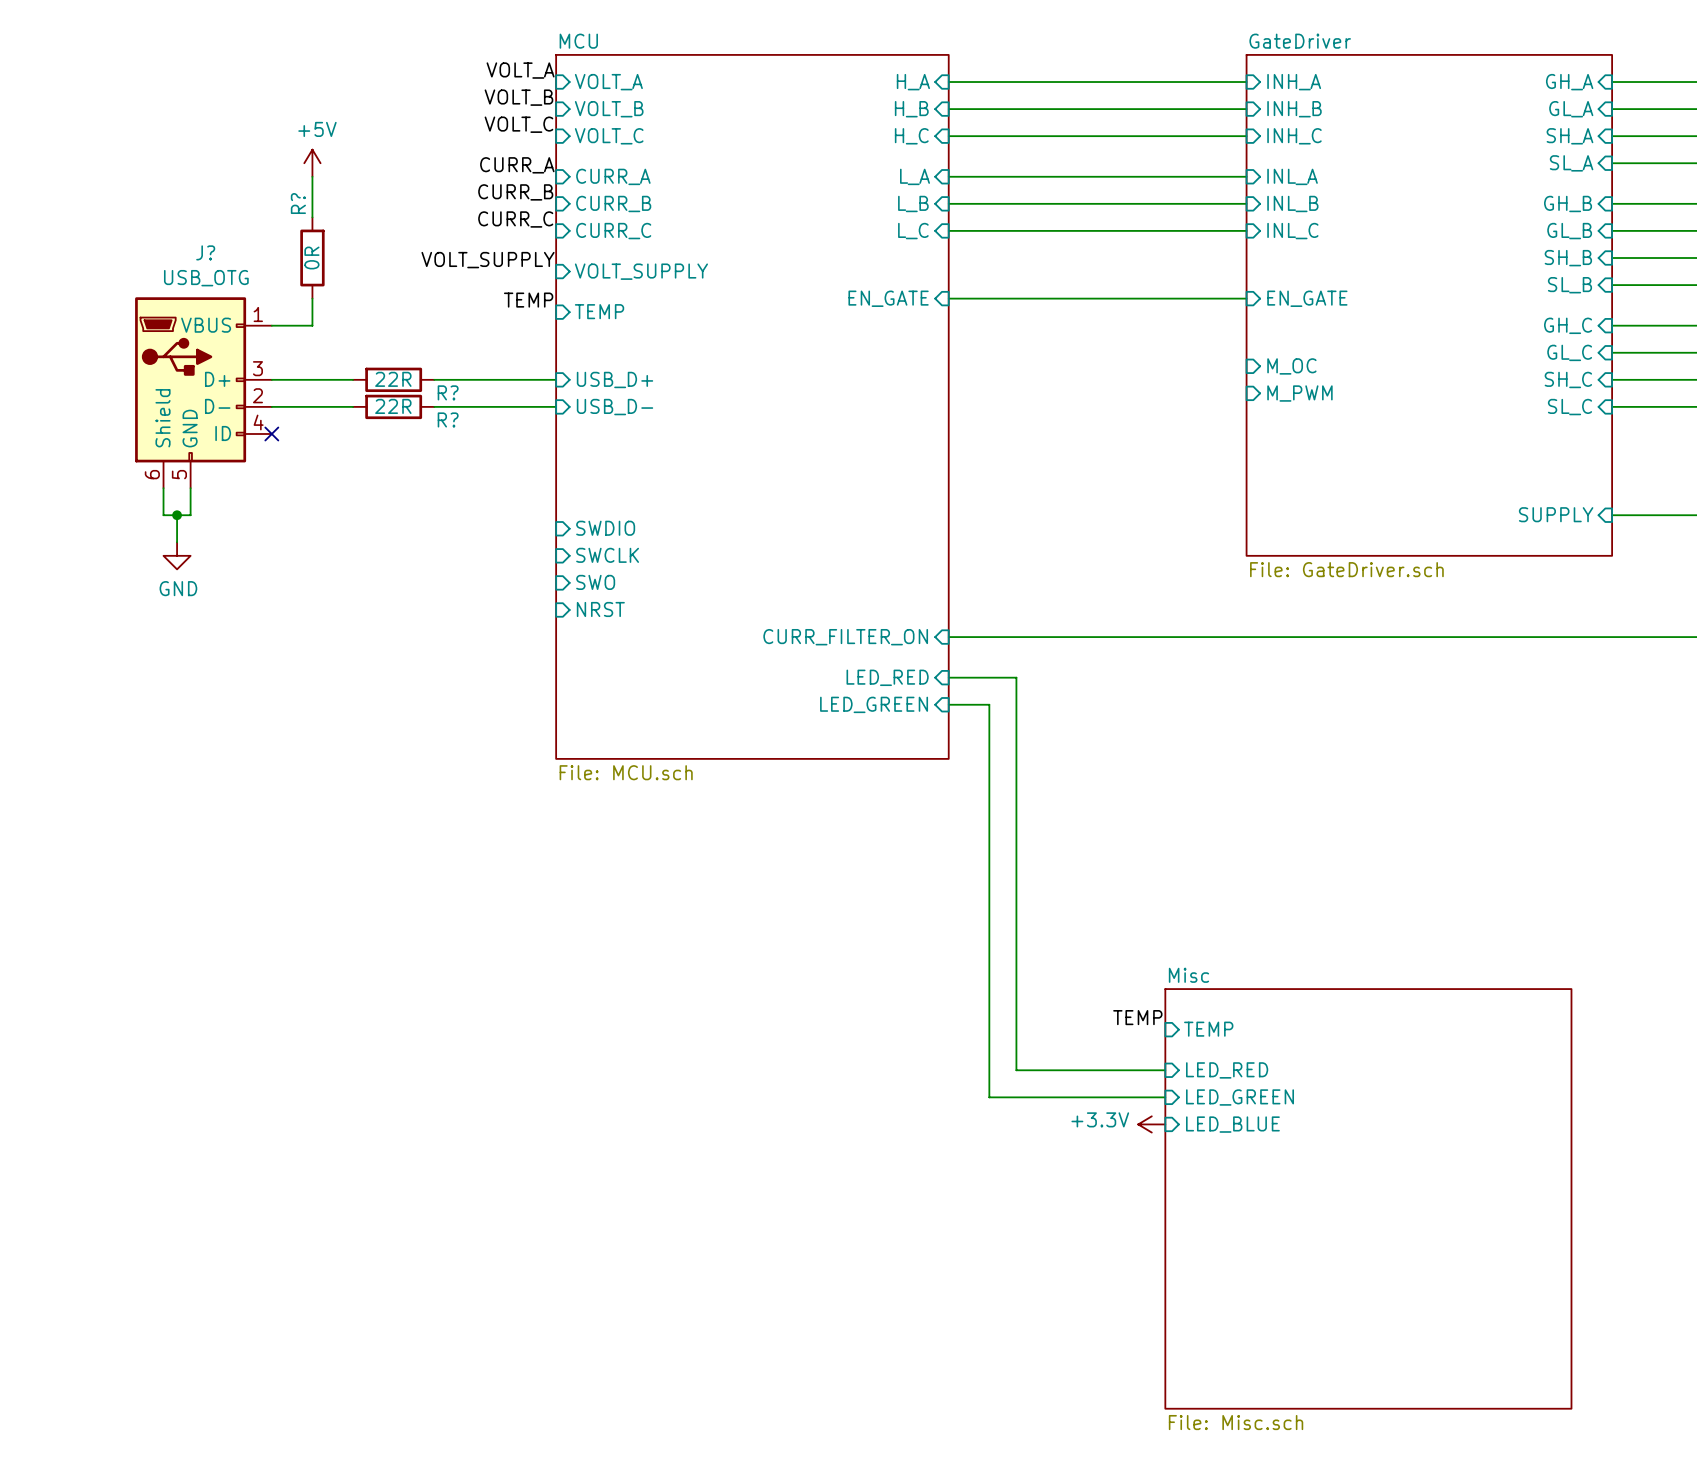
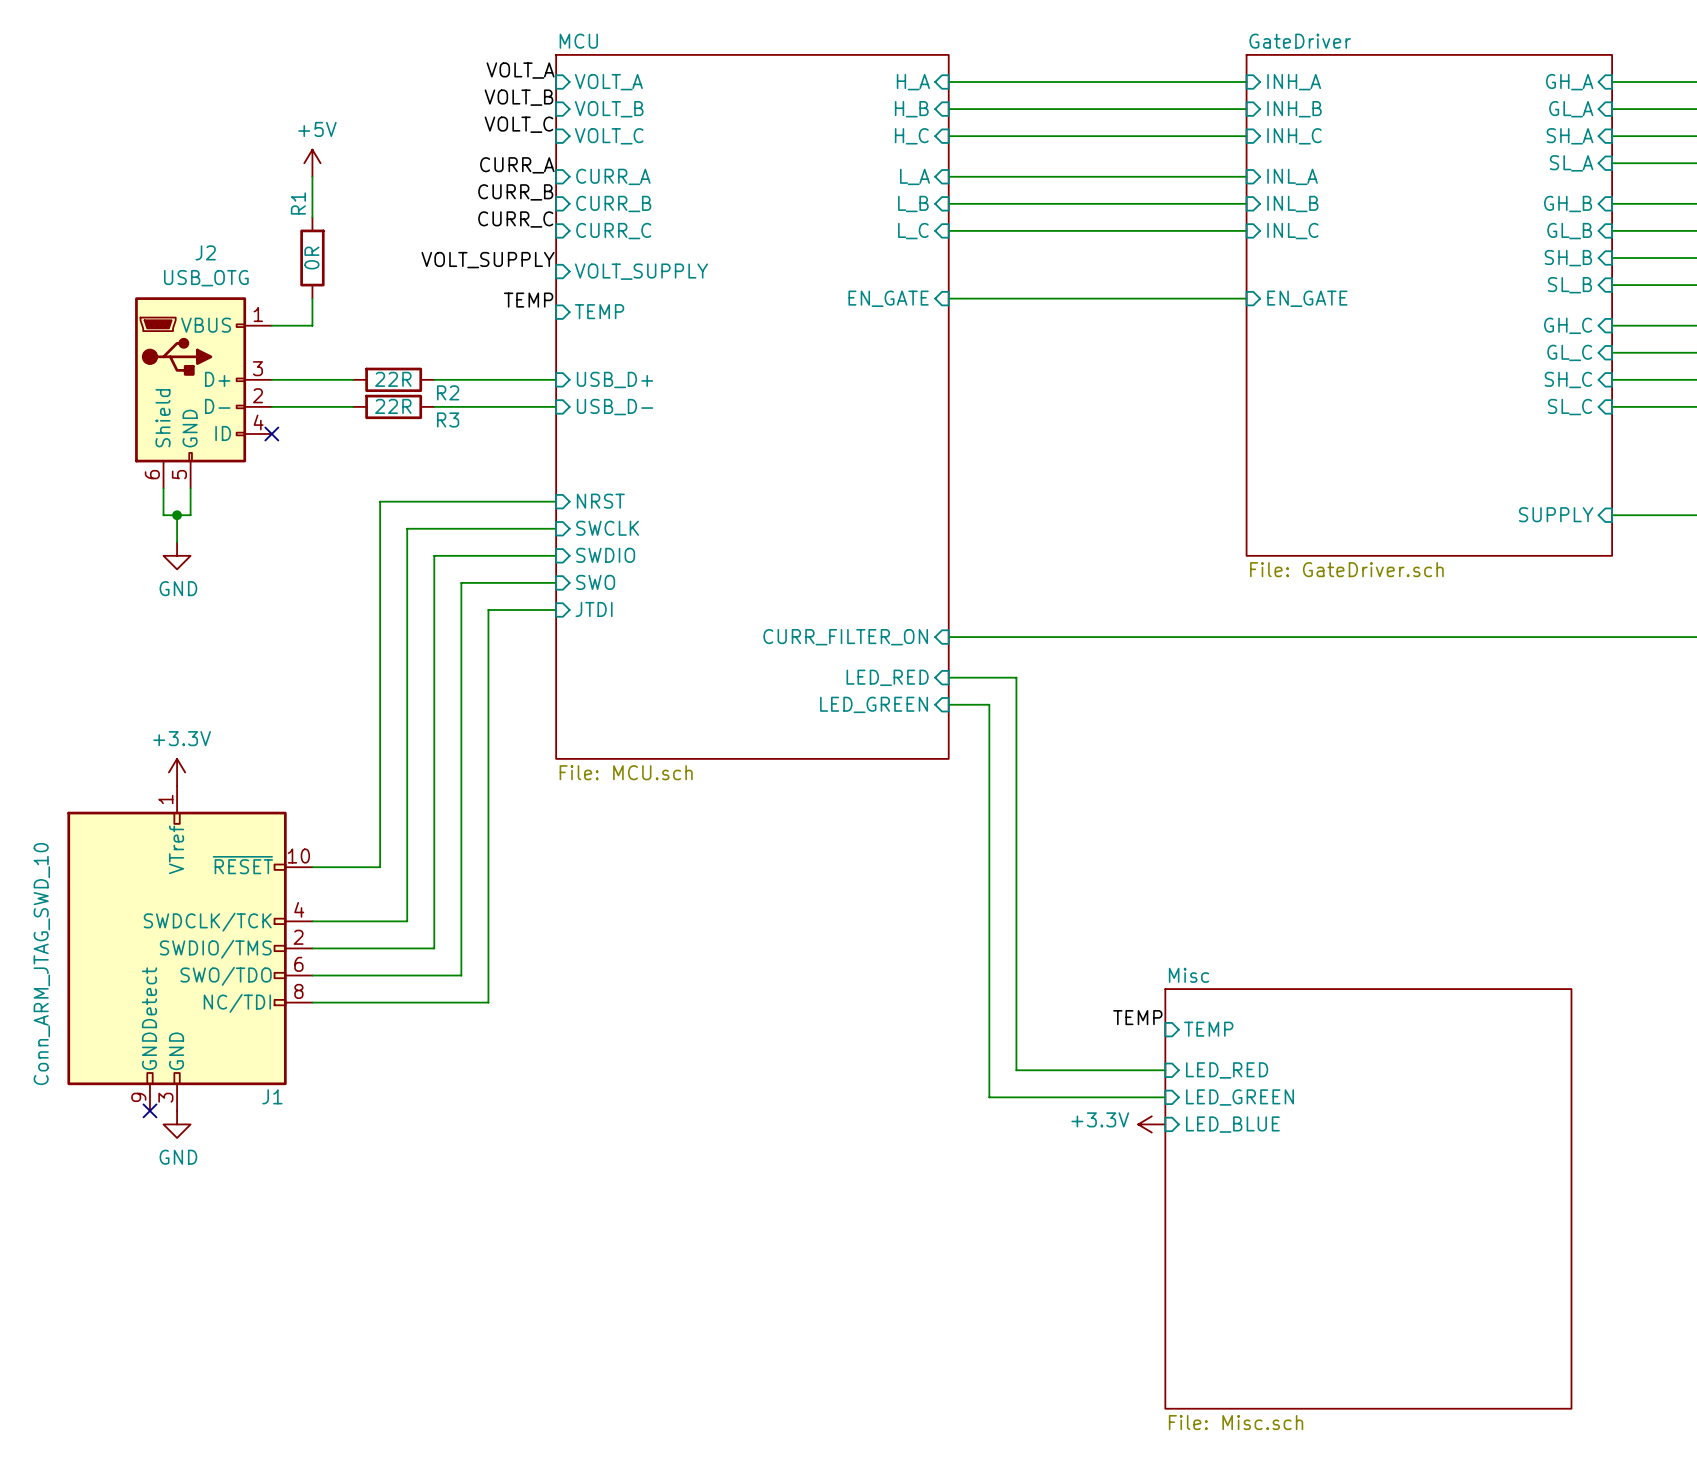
R? name: R? (298, 203) -> R1 (298, 203)
J? name: J? (205, 252) -> J2 (205, 252)
sheet pin: M_OC (1291, 366) -> none
R? name: R? (448, 392) -> R2 (448, 392)
sheet pin: M_PWM (1299, 393) -> none
R? name: R? (448, 419) -> R3 (448, 419)
wire: none -> (556, 501) (380, 501) (380, 867) (312, 867)
sheet pin: none -> NRST (600, 501)
wire: none -> (556, 528) (407, 528) (407, 921) (312, 921)
sheet pin: SWDIO (605, 528) -> SWCLK (607, 528)
wire: none -> (556, 555) (434, 555) (434, 948) (312, 948)
sheet pin: SWCLK (607, 555) -> SWDIO (605, 555)
wire: none -> (556, 582) (461, 582) (461, 975) (312, 975)
wire: none -> (556, 609) (488, 609) (488, 1002) (312, 1002)
sheet pin: NRST (600, 609) -> JTDI (594, 609)
power symbol: none -> +3.3V (177, 772)
J1: none -> Conn_ARM_JTAG_SWD_10 (189, 948)
no-connect mark: none -> (149, 1110)
power symbol: none -> GND (177, 1124)

